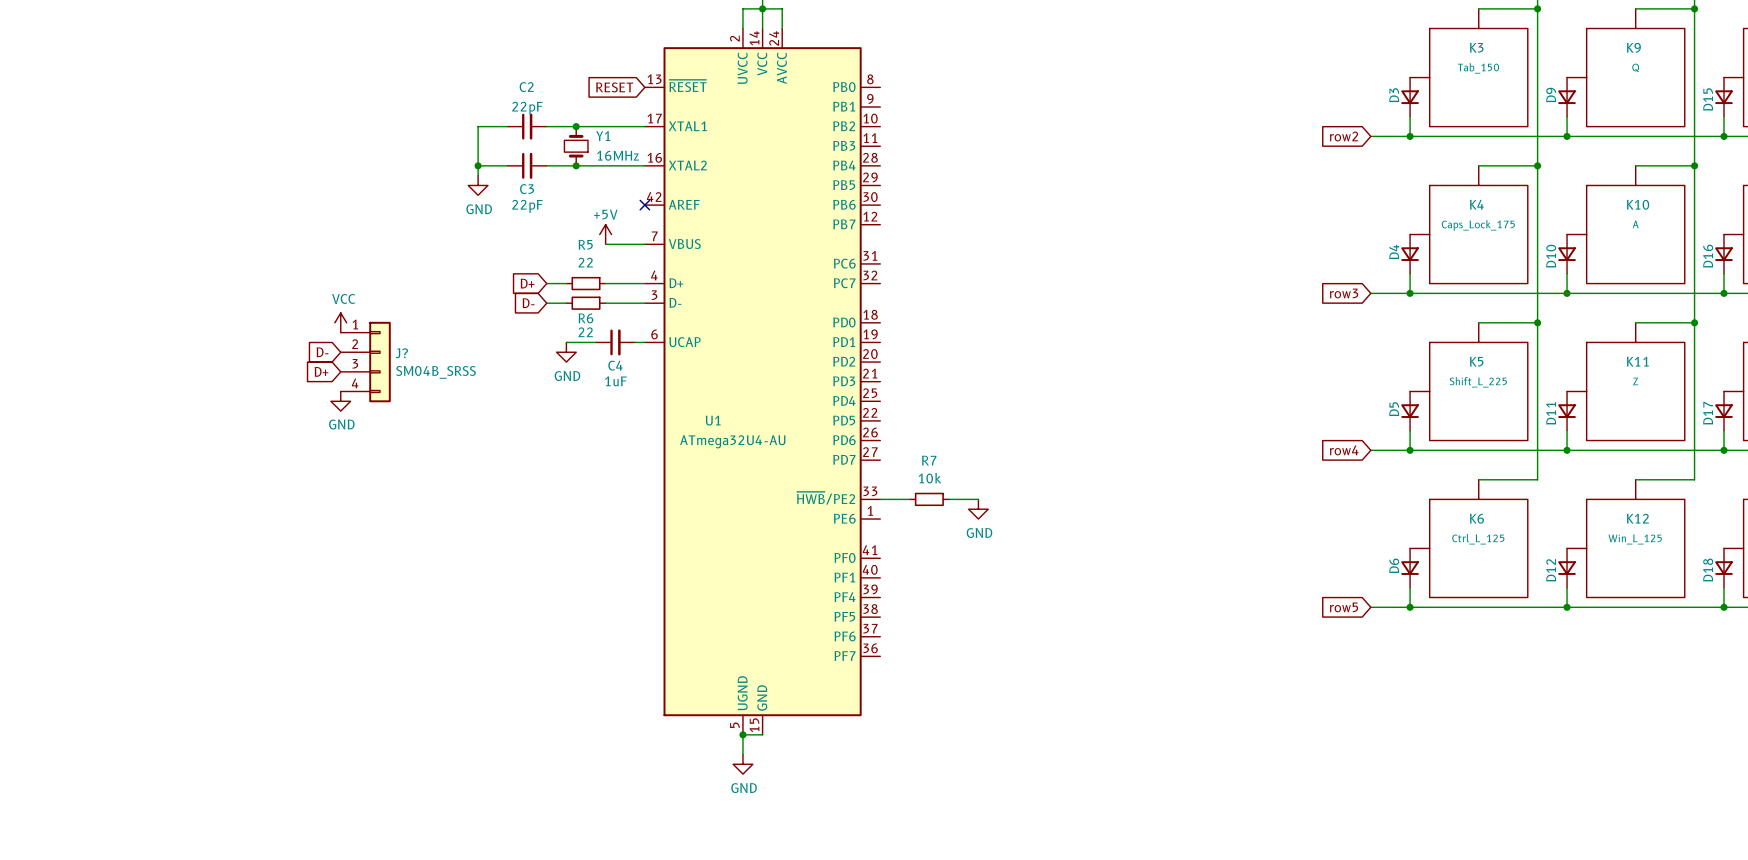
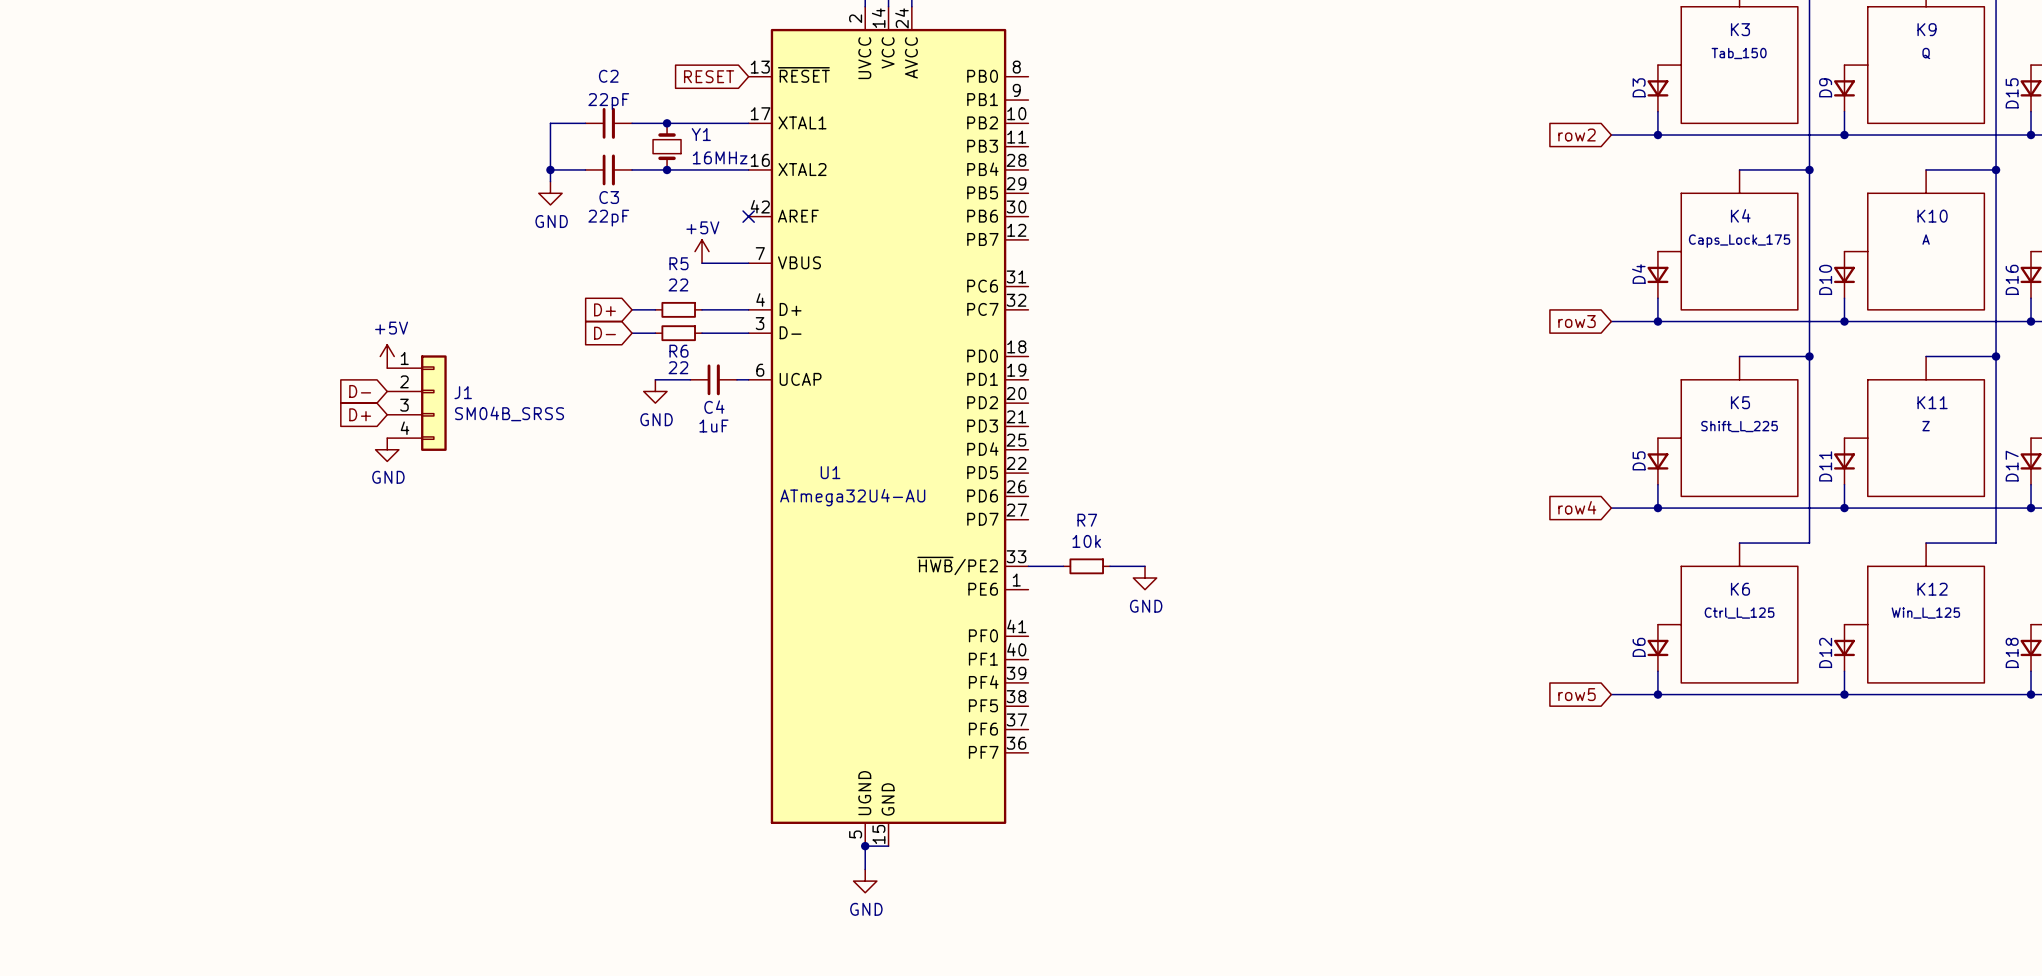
power symbol: VCC (340, 322) -> +5V (387, 356)
J? name: J? (401, 353) -> J1 (463, 392)

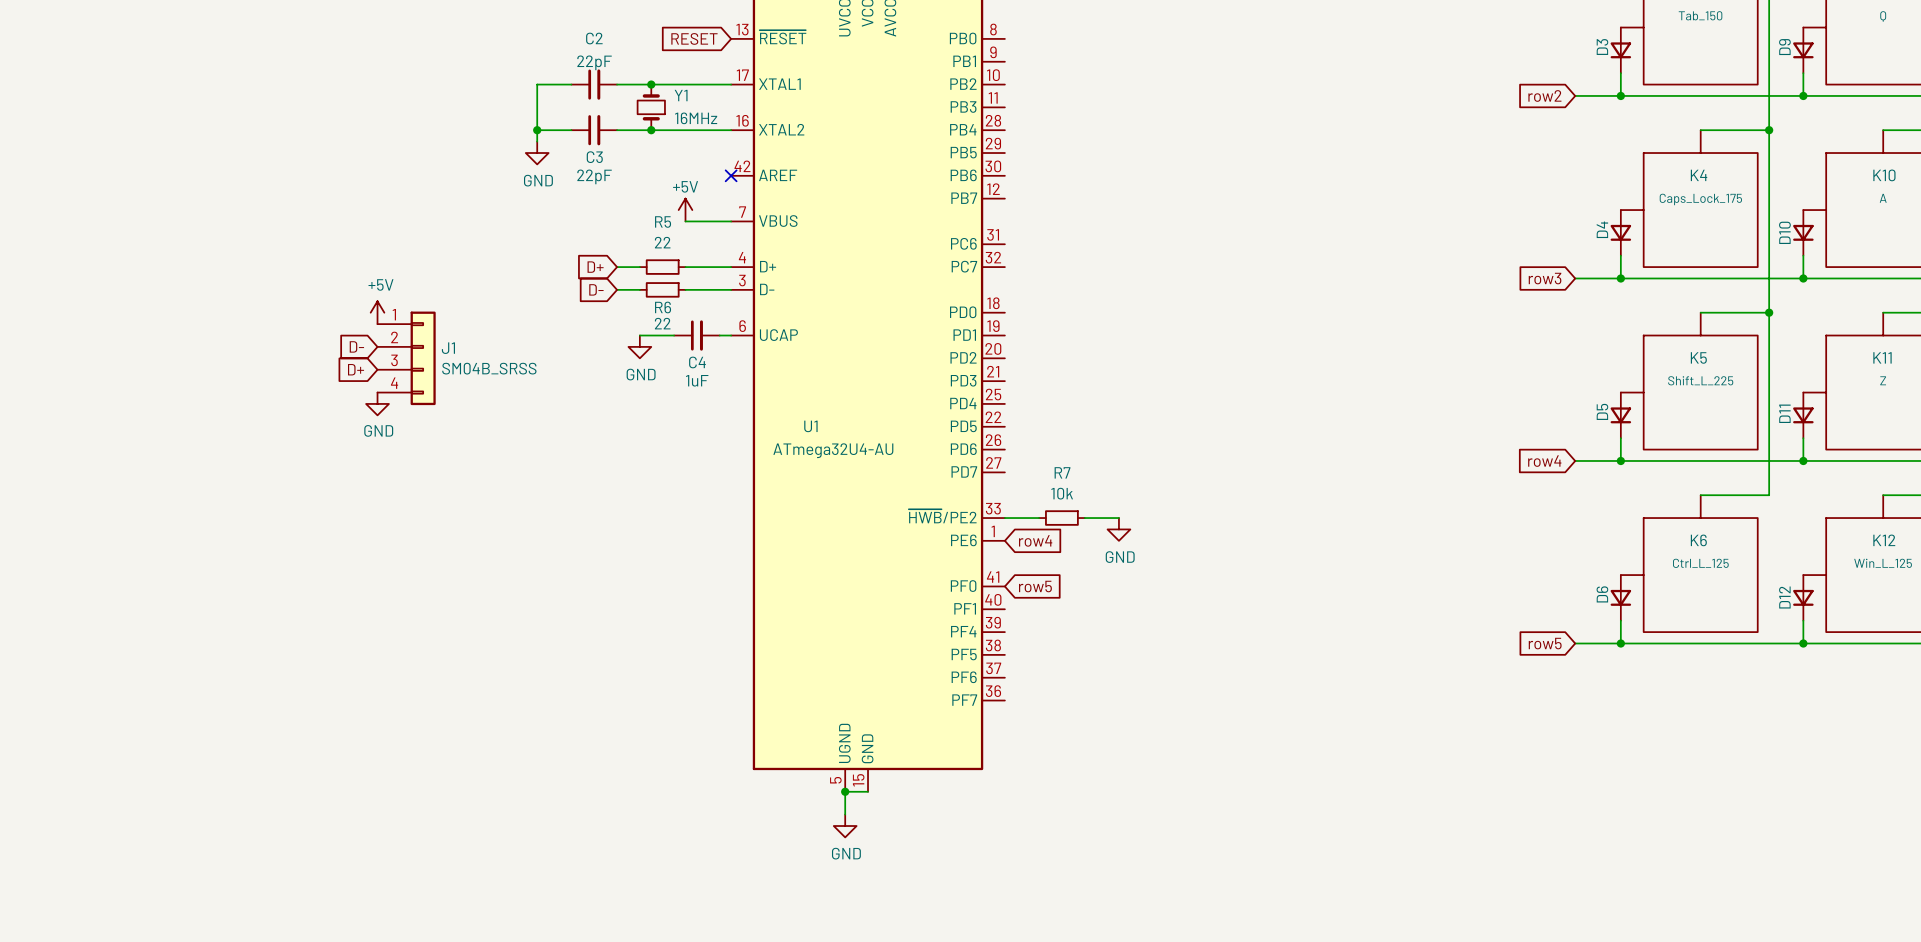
global label: none -> row4 (1035, 540)
global label: none -> row5 (1035, 586)

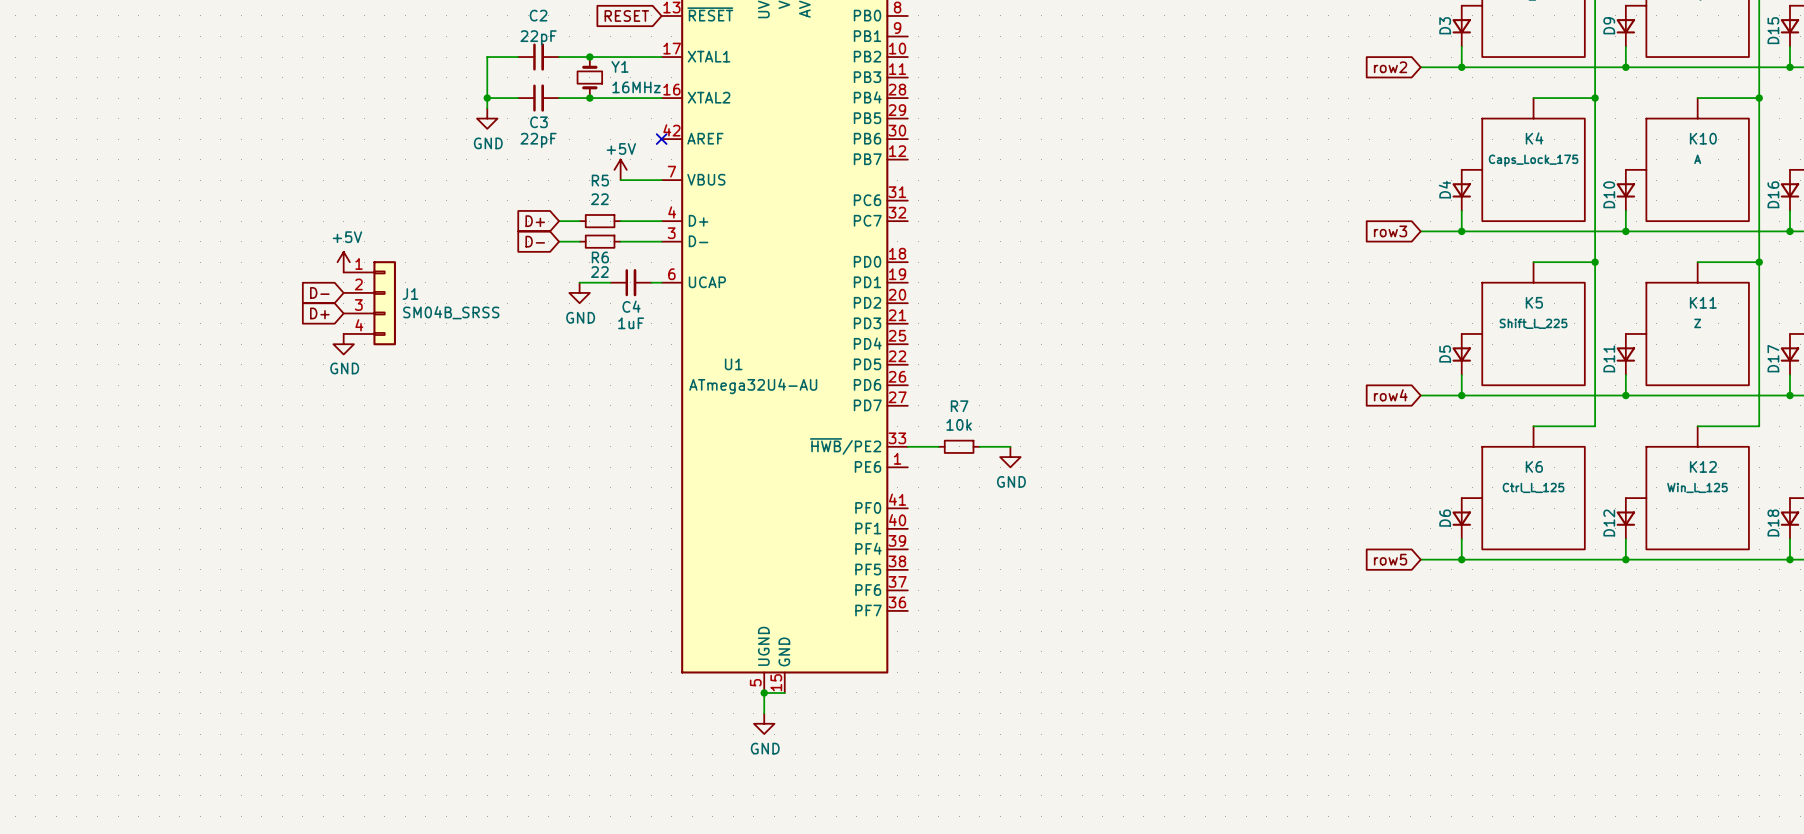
global label: row4 (1035, 540) -> none
global label: row5 (1035, 586) -> none

